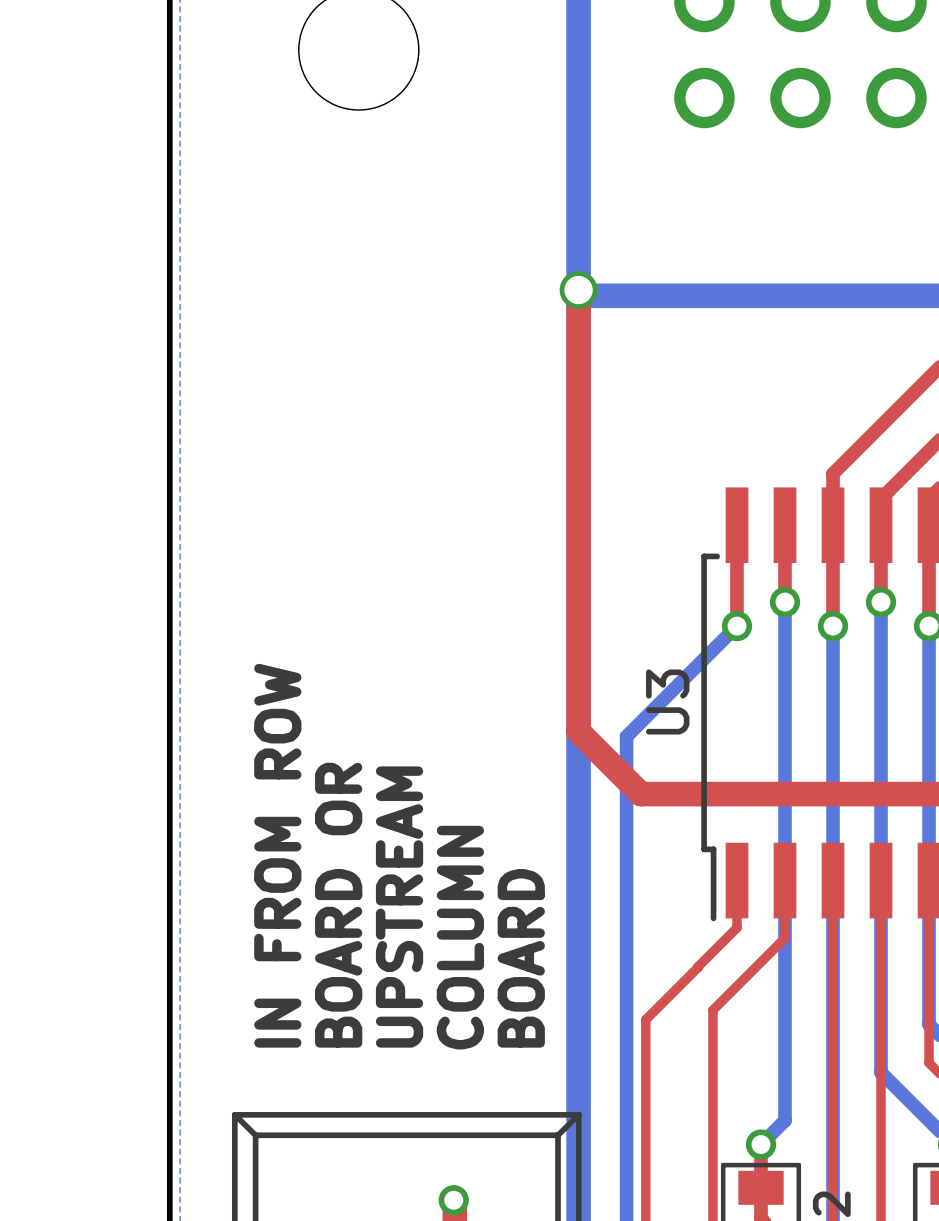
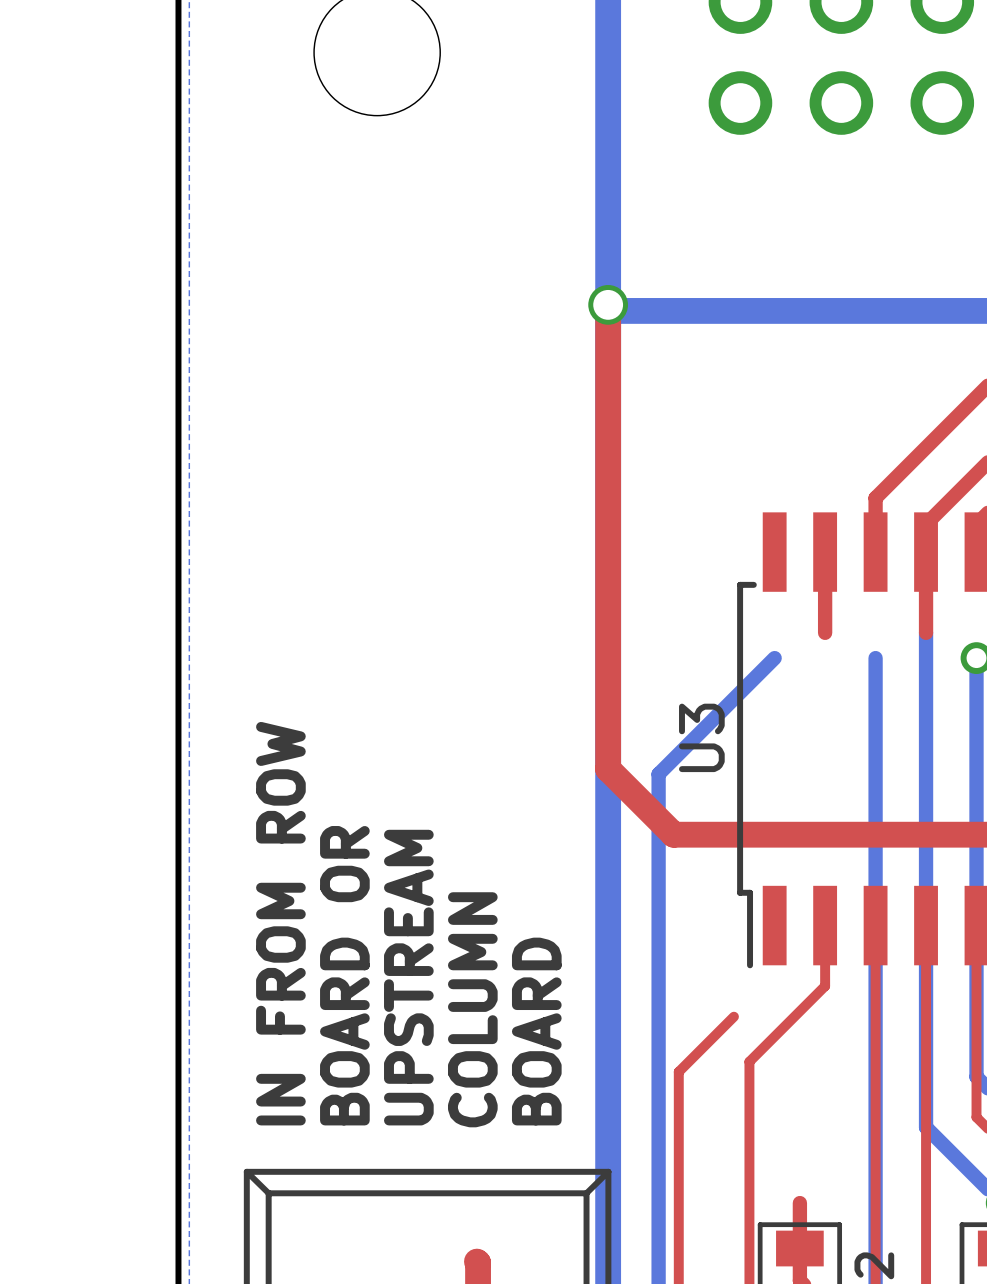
top track: (736, 525) (736, 626) -> none
top track: (833, 525) (833, 626) -> none
top track: (929, 525) (929, 626) -> none
bottom track: (785, 602) (785, 1120) (760, 1144) -> none
via: (785, 602) -> none
via: (881, 602) -> none
via: (736, 626) -> none
via: (833, 626) -> none
text position: IN FROM ROW (277, 855) -> IN FROM ROW (280, 923)
top track: (736, 880) (736, 927) (698, 966) -> none
text position: BOARD OR (338, 905) -> BOARD OR (344, 975)
text position: UPSTREAM (399, 907) -> UPSTREAM (408, 977)
text position: COLUMN (460, 937) -> COLUMN (472, 1009)
text position: BOARD (521, 958) -> BOARD (536, 1031)
via: (760, 1144) -> none
via: (453, 1200) -> none

